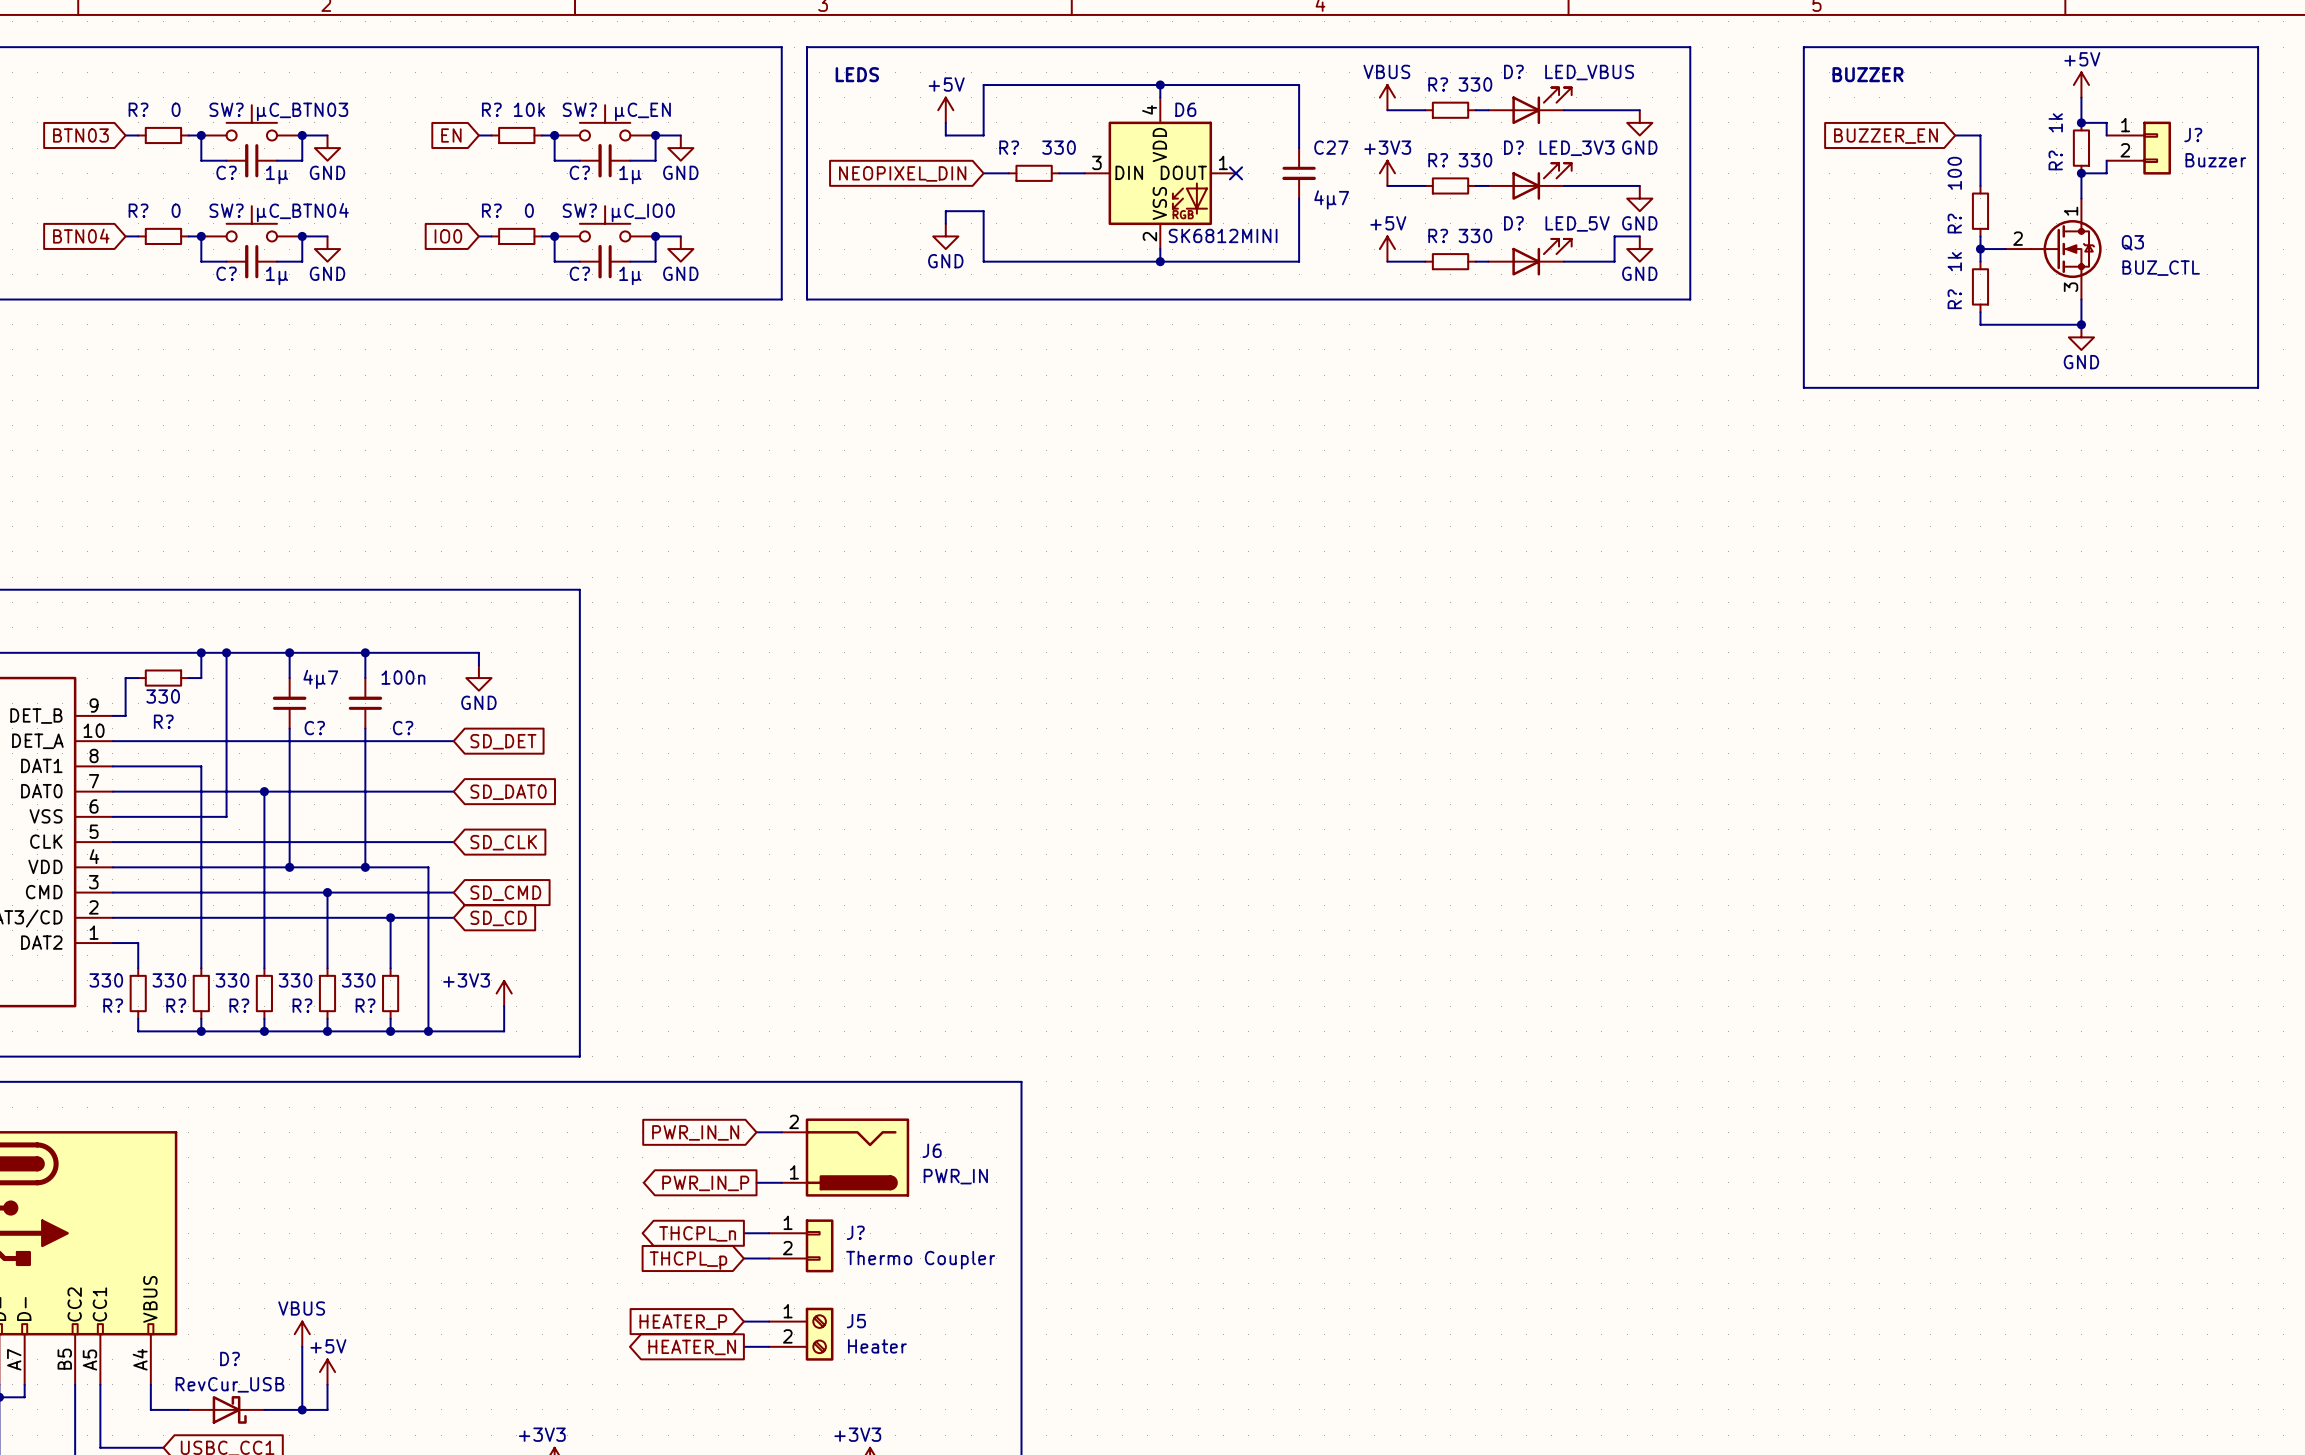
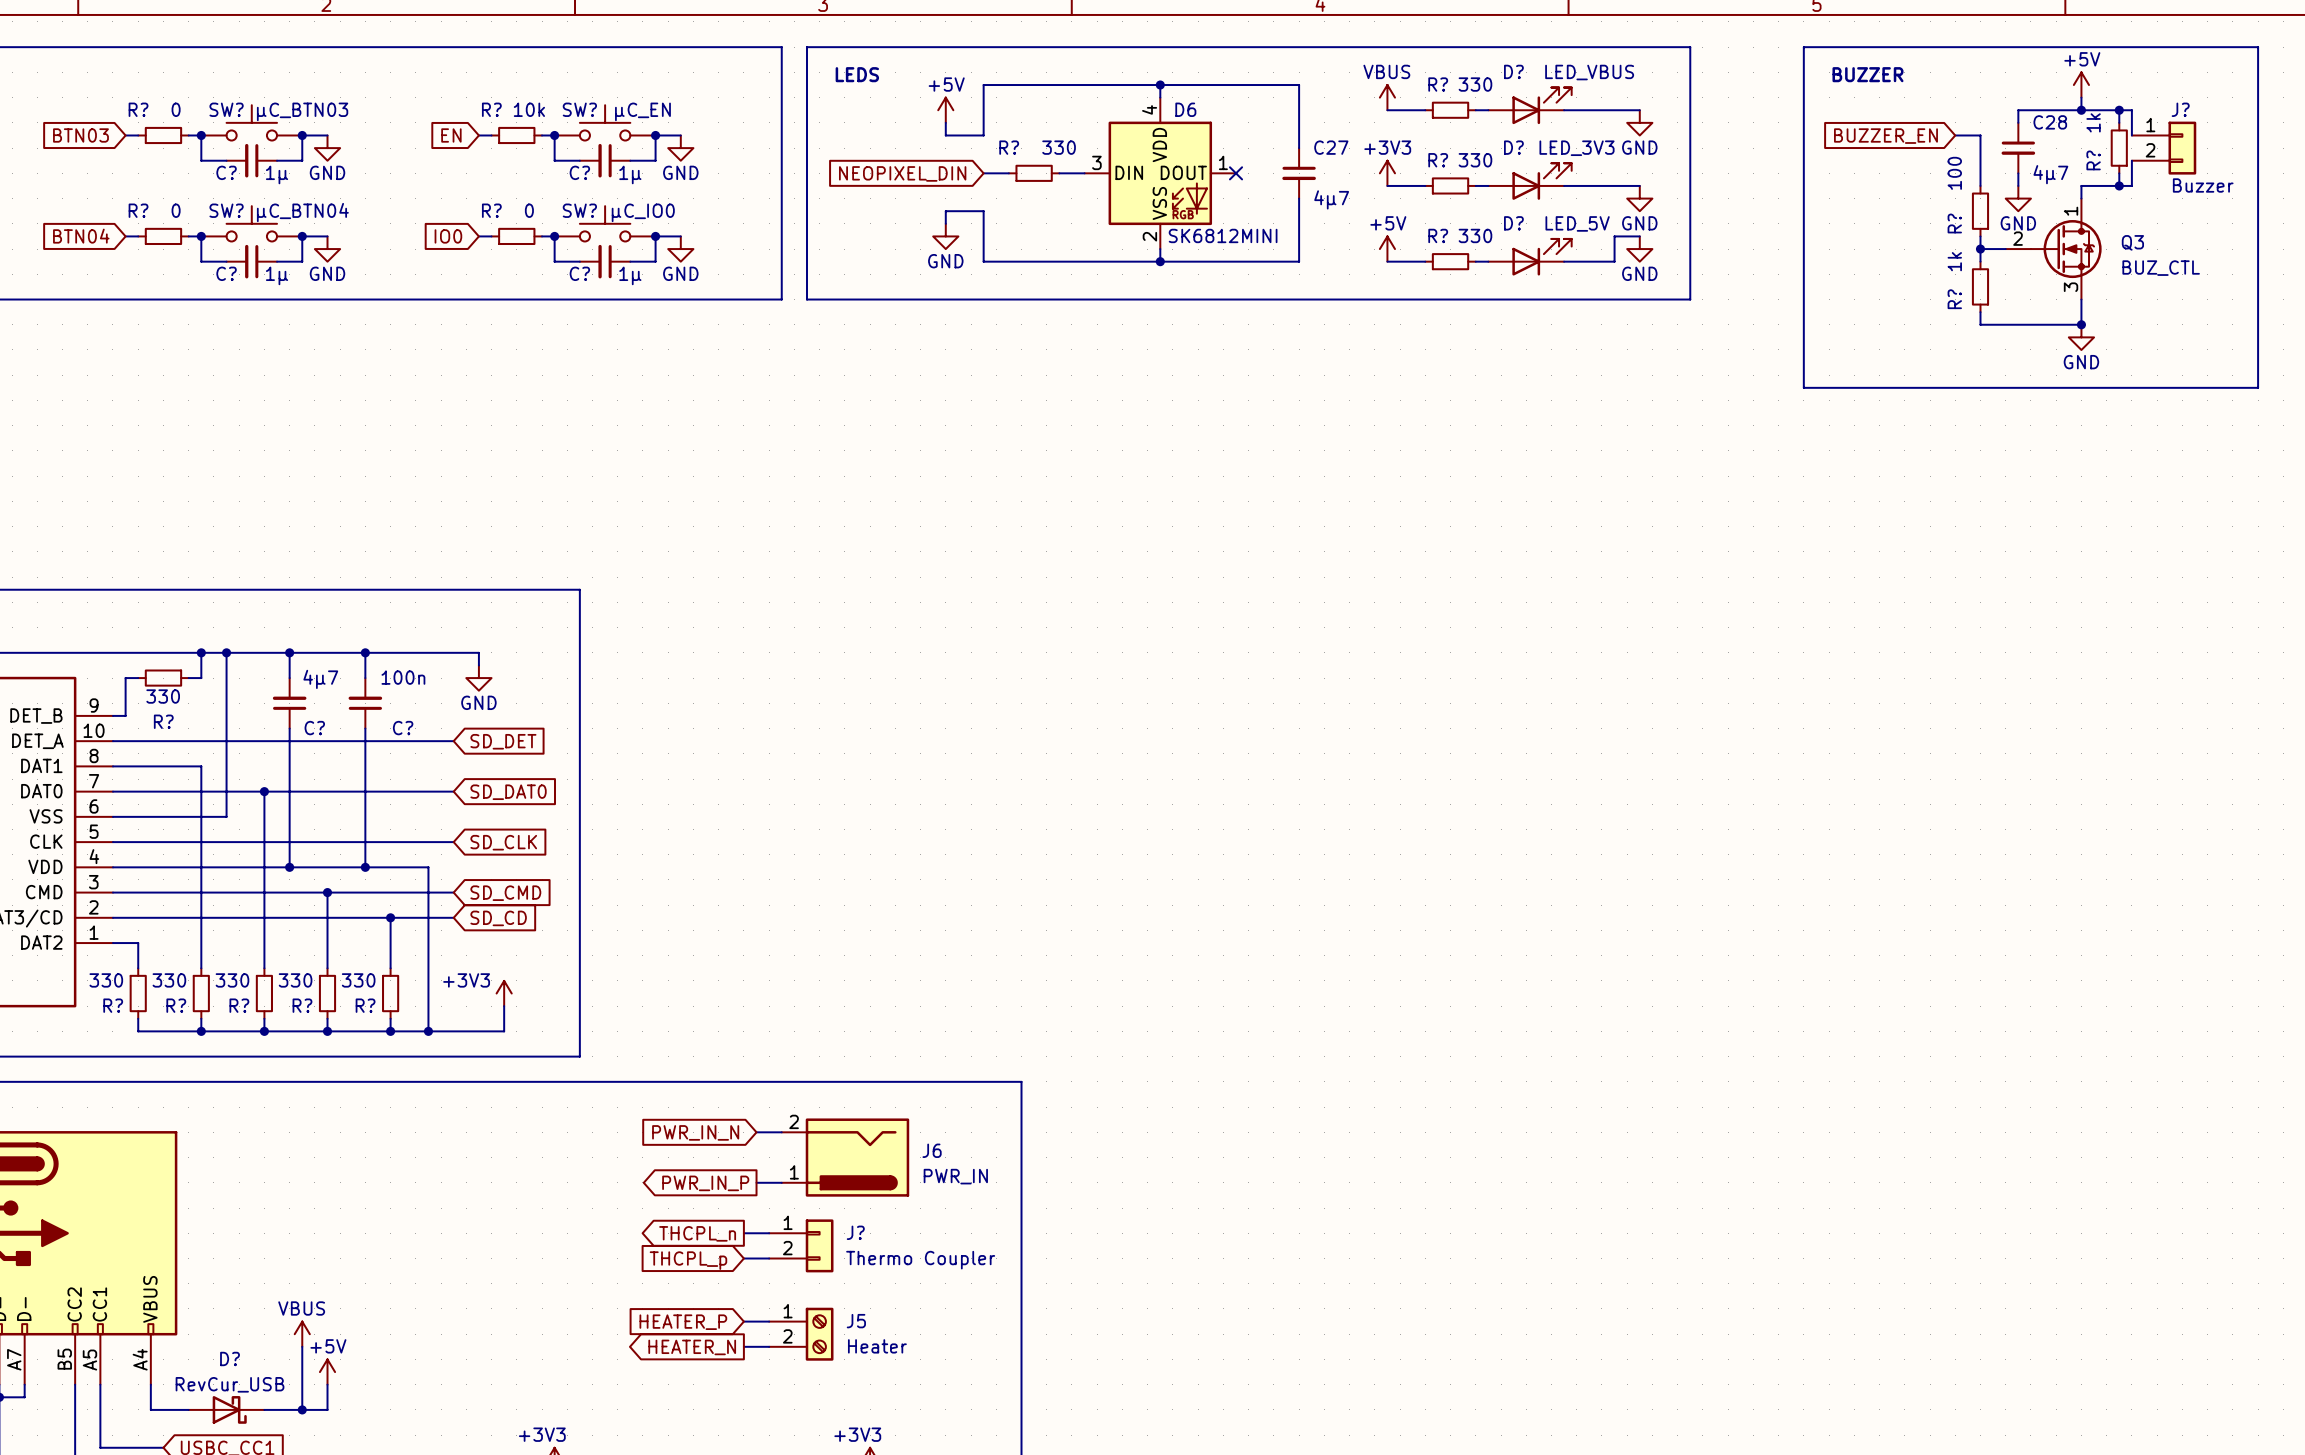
wire: (2081, 110) (2081, 122) (2106, 122) (2106, 135) -> none
wire: none -> (2119, 110) (2119, 122)
junction: none -> (2119, 110)
wire: none -> (2018, 122) (2018, 110) (2131, 110) (2131, 135)
junction position: (2081, 122) -> (2081, 110)
J? name position: J? (2193, 135) -> J? (2180, 109)
C28: none -> 4µ7 (2018, 148)
R? position: (2081, 148) -> (2119, 148)
J? position: (2138, 148) -> (2164, 148)
wire: (2106, 160) (2106, 173) (2081, 173) (2081, 185) -> (2131, 160) (2131, 185) (2081, 185)
J? value position: Buzzer (2215, 160) -> Buzzer (2203, 185)
wire: none -> (2018, 173) (2018, 185)
junction: (2081, 173) -> none
wire: none -> (2119, 173) (2119, 185)
junction: none -> (2119, 185)
power symbol: none -> GND (2018, 198)

